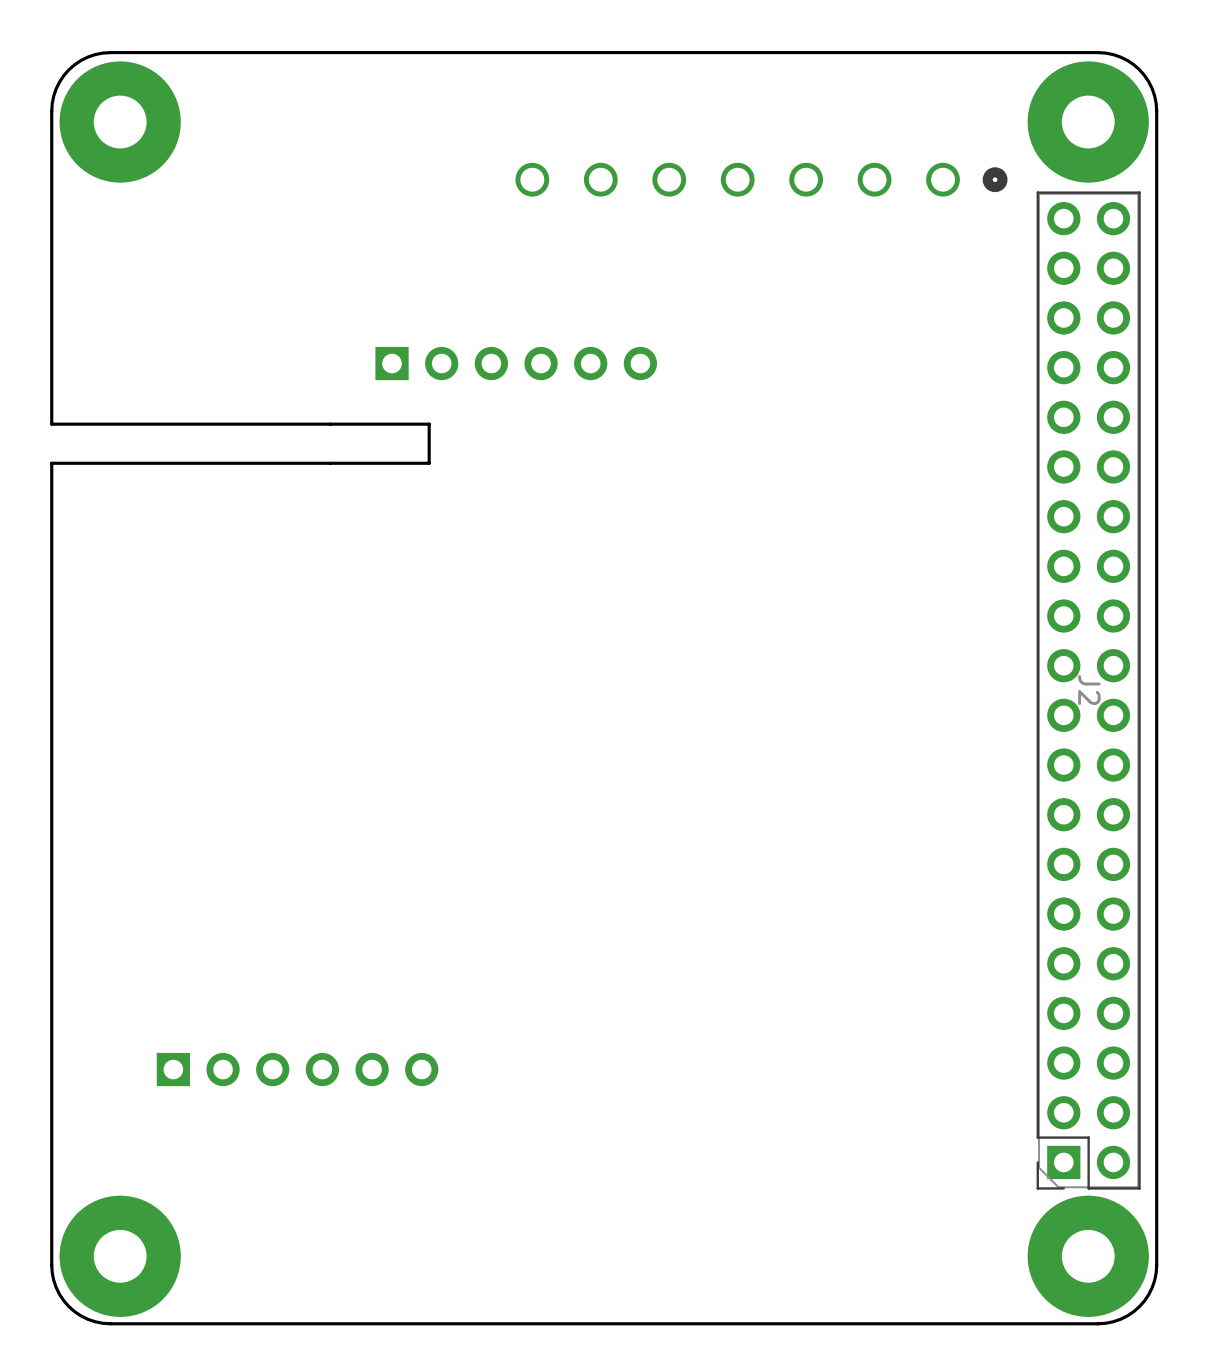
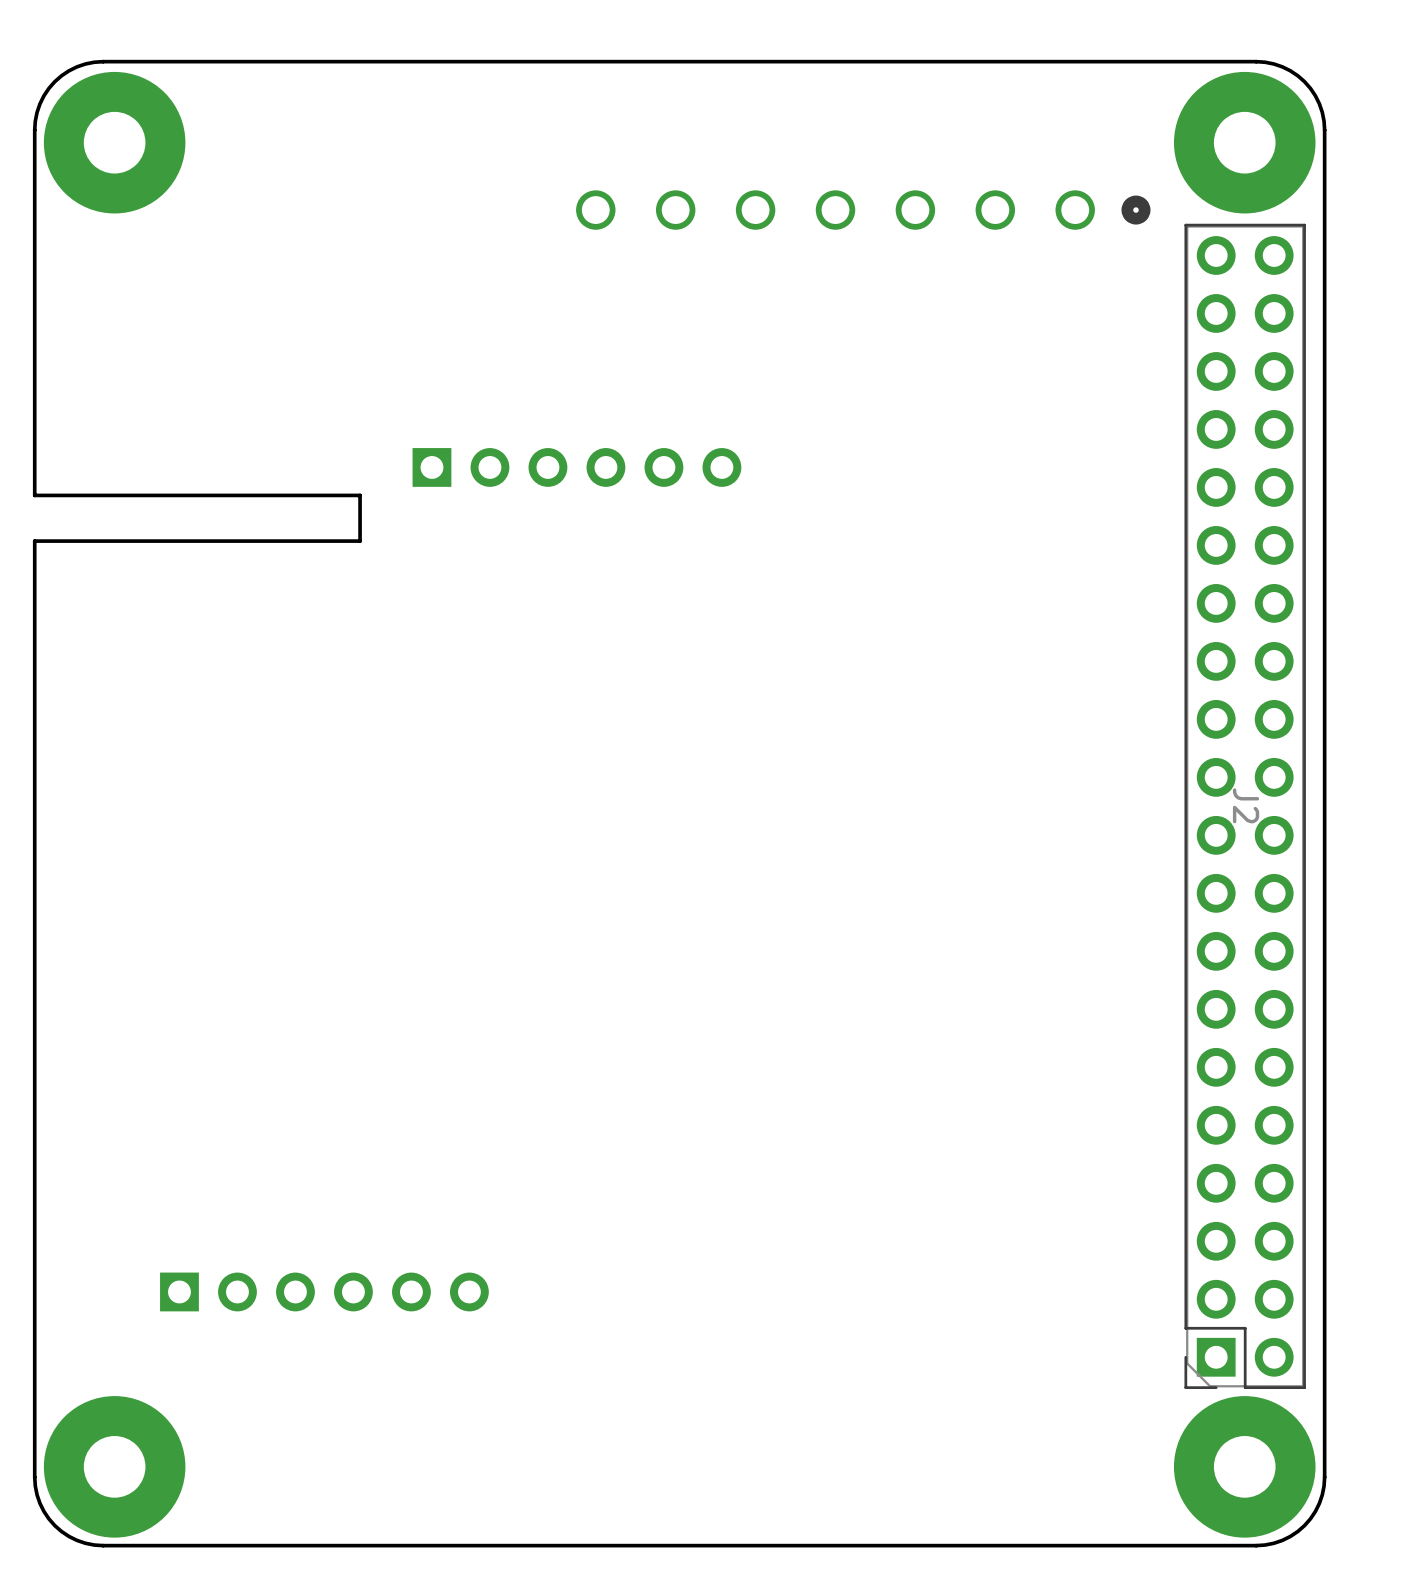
part position: (516, 363) -> (576, 467)
board edge: (330, 424) (429, 424) (429, 463) (330, 463) -> (360, 495) (360, 541)
part position: (297, 1069) -> (324, 1291)

